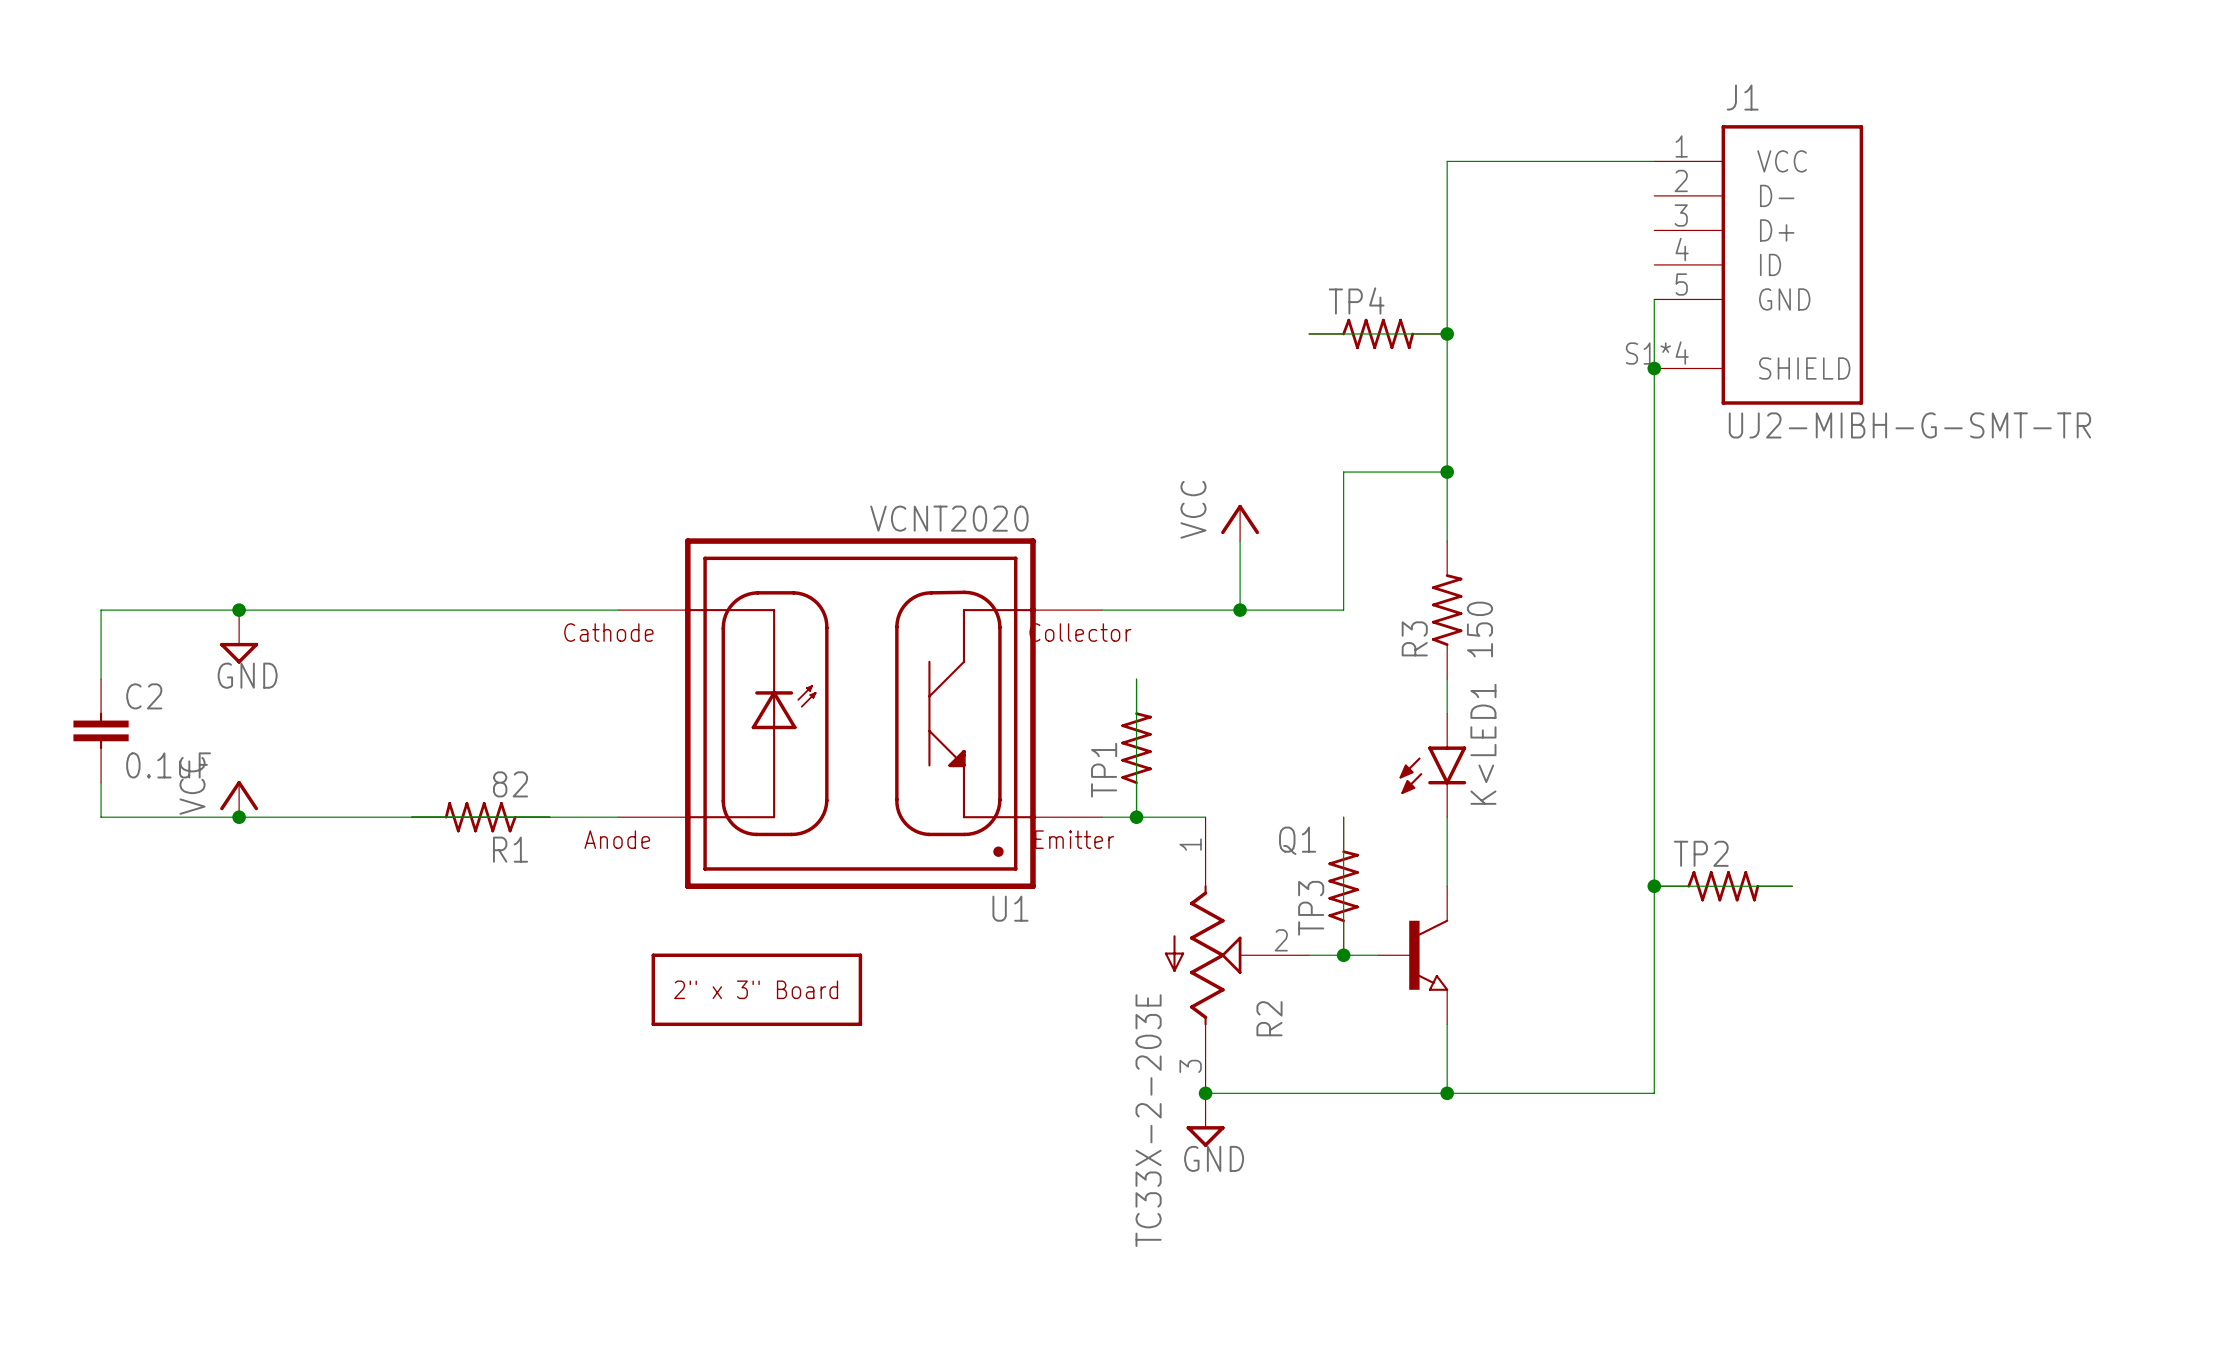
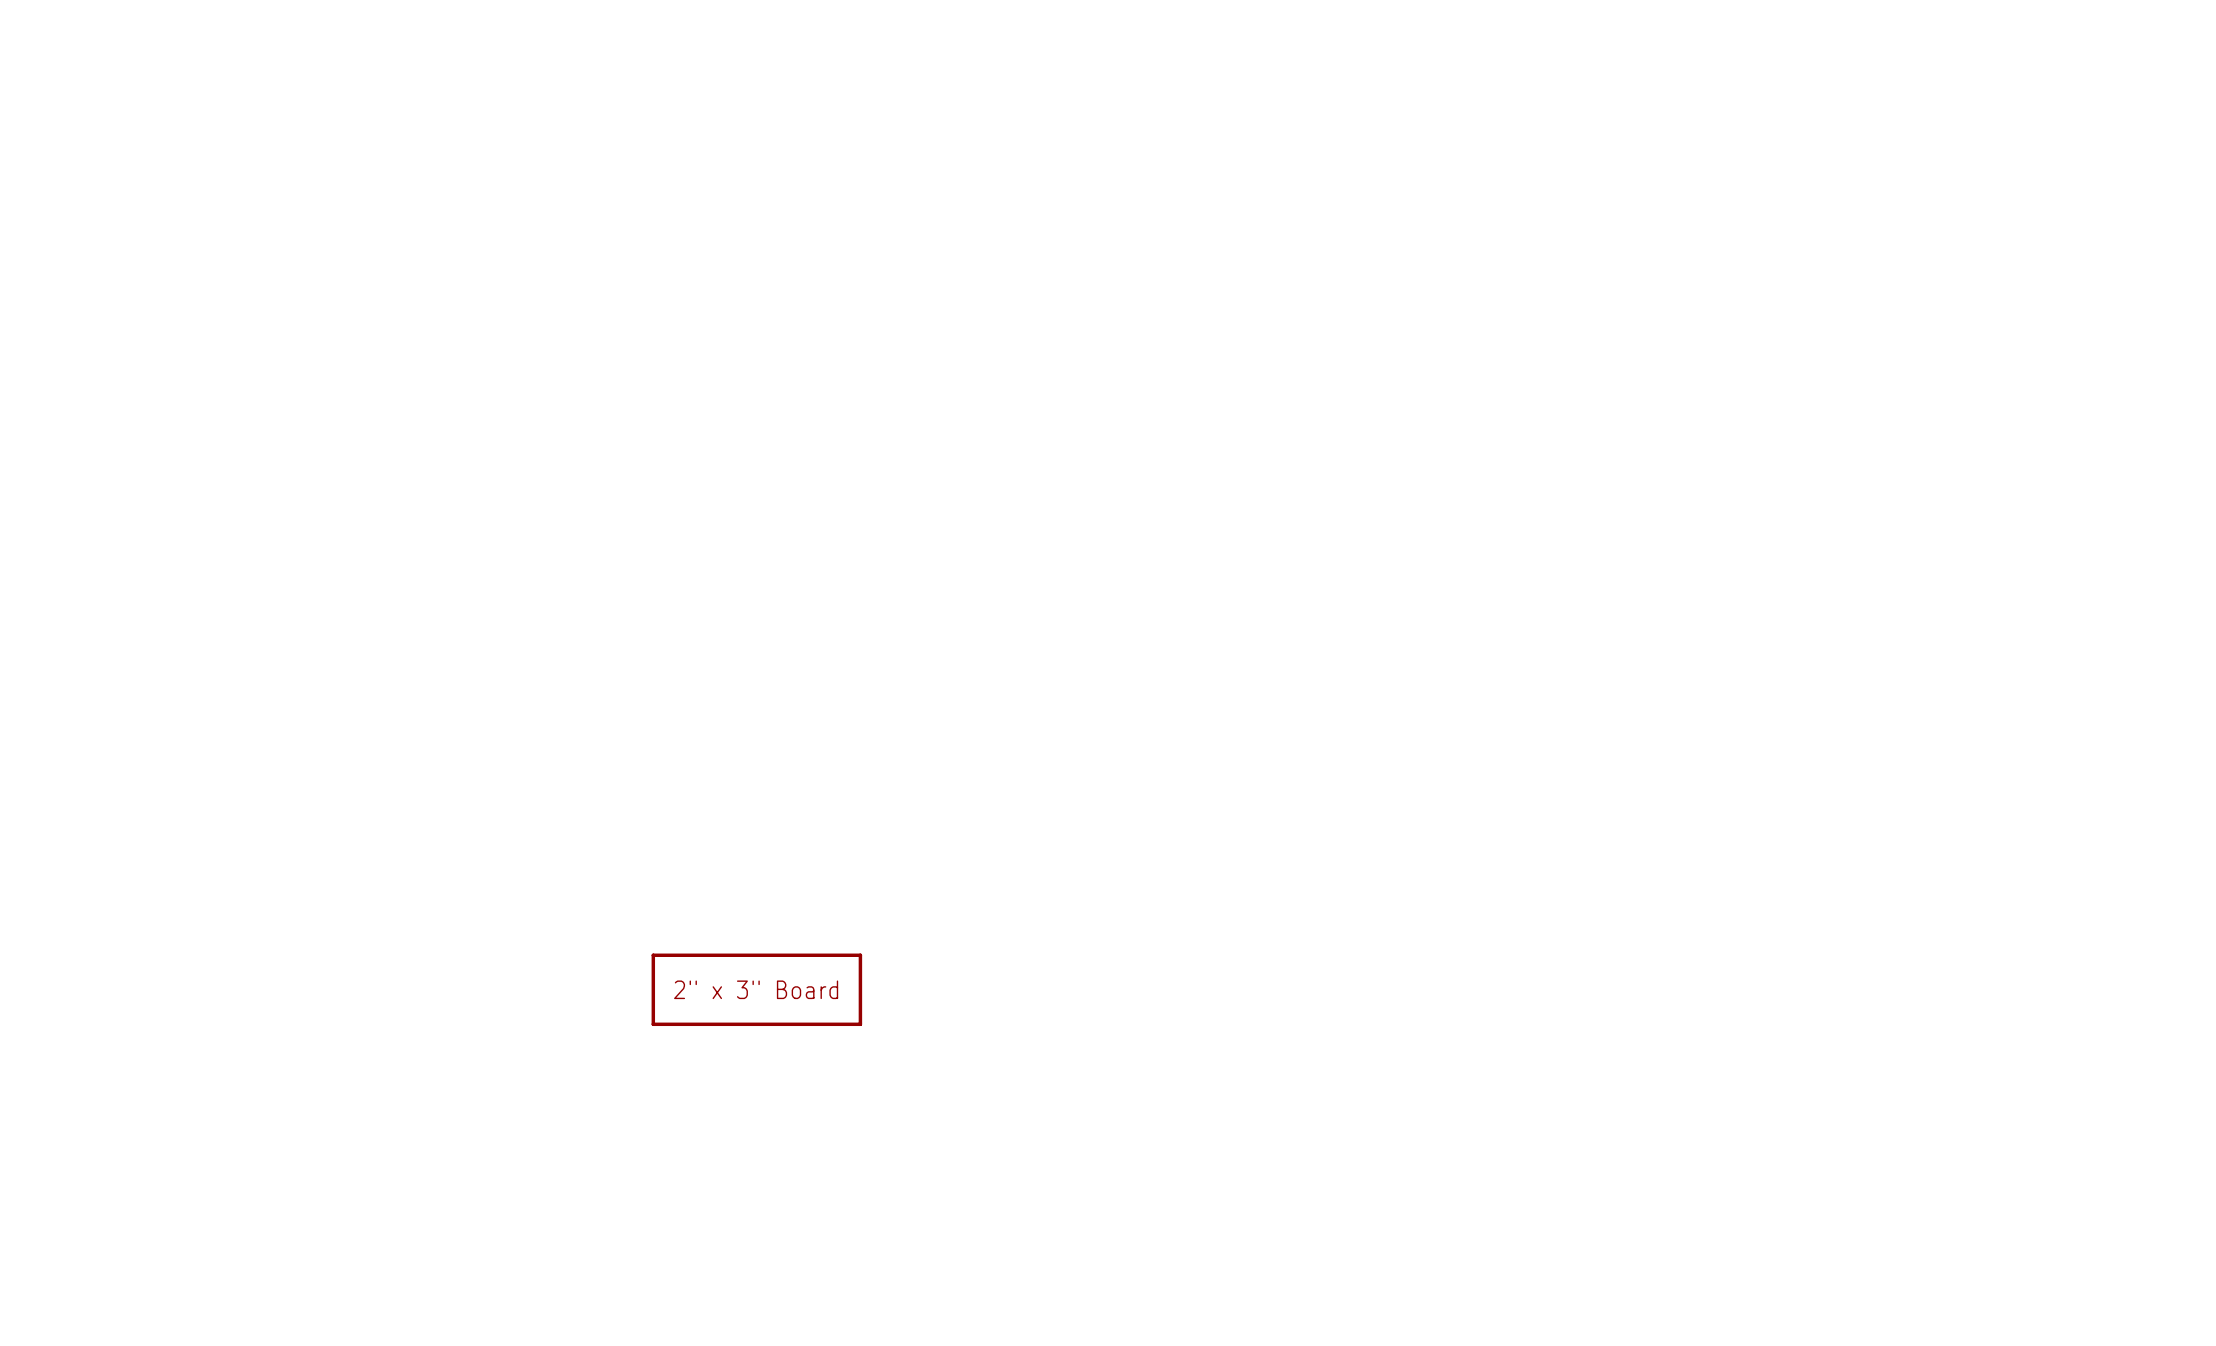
wire: (1654, 161) (1447, 161) (1447, 541) -> none
J1: UJ2-MIBH-G-SMT-TR (1758, 264) -> none
wire: (1654, 299) (1654, 1093) (1205, 1093) -> none
wire: (1309, 333) (1447, 333) -> none
TP4: (1378, 333) -> none
junction: (1447, 333) -> none
junction: (1654, 368) -> none
wire: (1447, 472) (1343, 472) (1343, 610) (1102, 610) -> none
junction: (1447, 472) -> none
power symbol: VCC (1240, 522) -> none
wire: (1240, 541) (1240, 610) -> none
junction: (239, 610) -> none
wire: (618, 610) (101, 610) (101, 679) -> none
junction: (1240, 610) -> none
R3: 150 (1447, 610) -> none
power symbol: GND (239, 636) -> none
wire: (1136, 679) (1136, 817) -> none
wire: (1447, 679) (1447, 713) -> none
U1: VCNT2020 (860, 713) -> none
C2: 0.1uF (101, 730) -> none
TP1: (1136, 748) -> none
K<LED1: (1432, 765) -> none
wire: (101, 782) (101, 817) (618, 817) -> none
power symbol: VCC (239, 799) -> none
junction: (239, 817) -> none
R1: 82 (480, 817) -> none
wire: (1102, 817) (1205, 817) -> none
junction: (1136, 817) -> none
wire: (1343, 817) (1343, 955) -> none
wire: (1447, 817) (1447, 886) -> none
TP3: (1343, 886) -> none
wire: (1654, 886) (1792, 886) -> none
junction: (1654, 886) -> none
TP2: (1723, 886) -> none
R2: TC33X-2-203E (1236, 955) -> none
wire: (1309, 955) (1378, 955) -> none
junction: (1343, 955) -> none
Q1: (1413, 955) -> none
wire: (1447, 1024) (1447, 1093) -> none
junction: (1205, 1093) -> none
junction: (1447, 1093) -> none
power symbol: GND (1205, 1120) -> none

